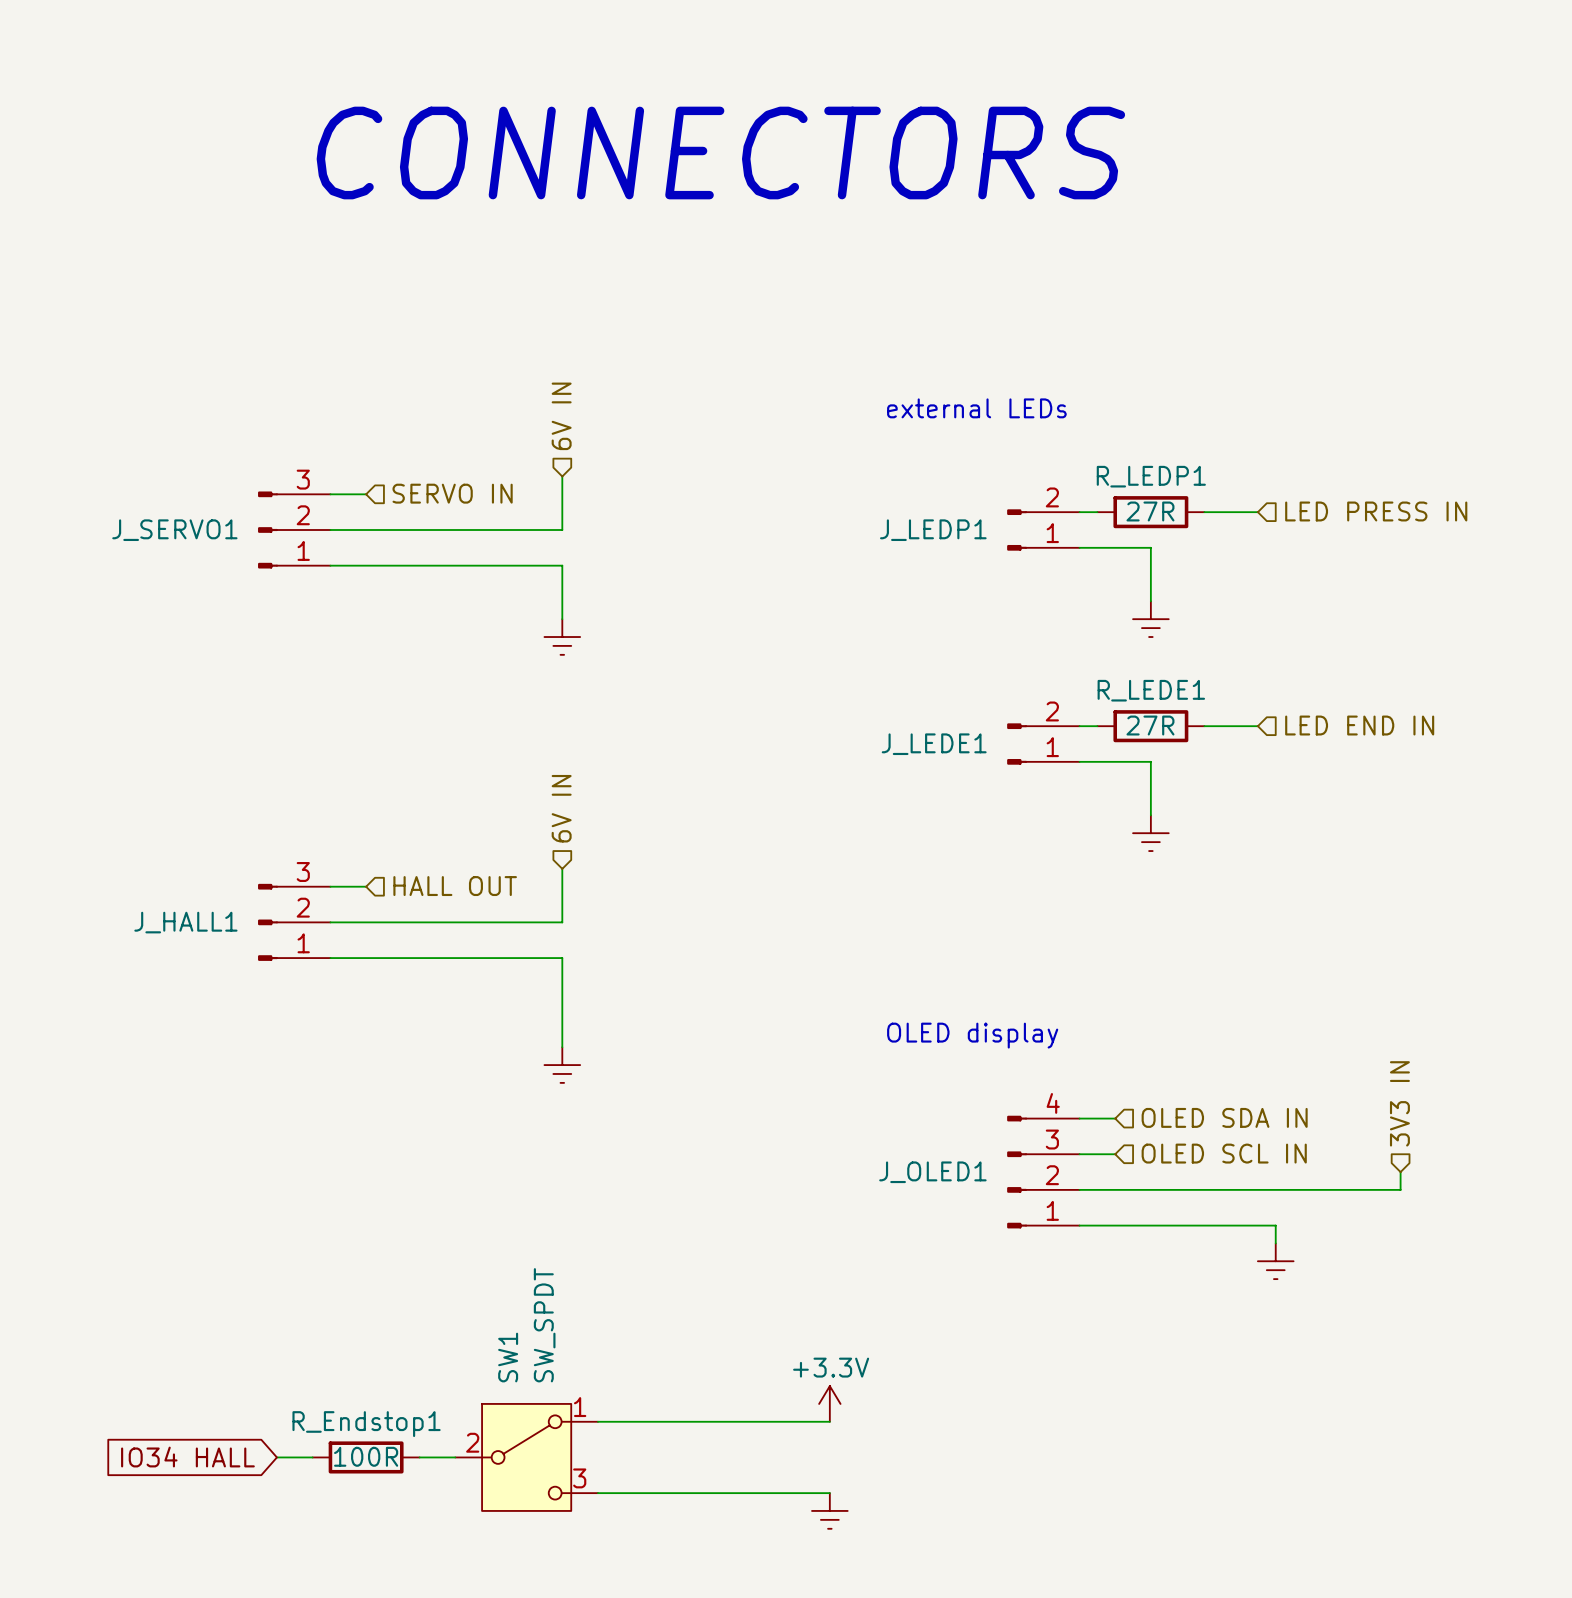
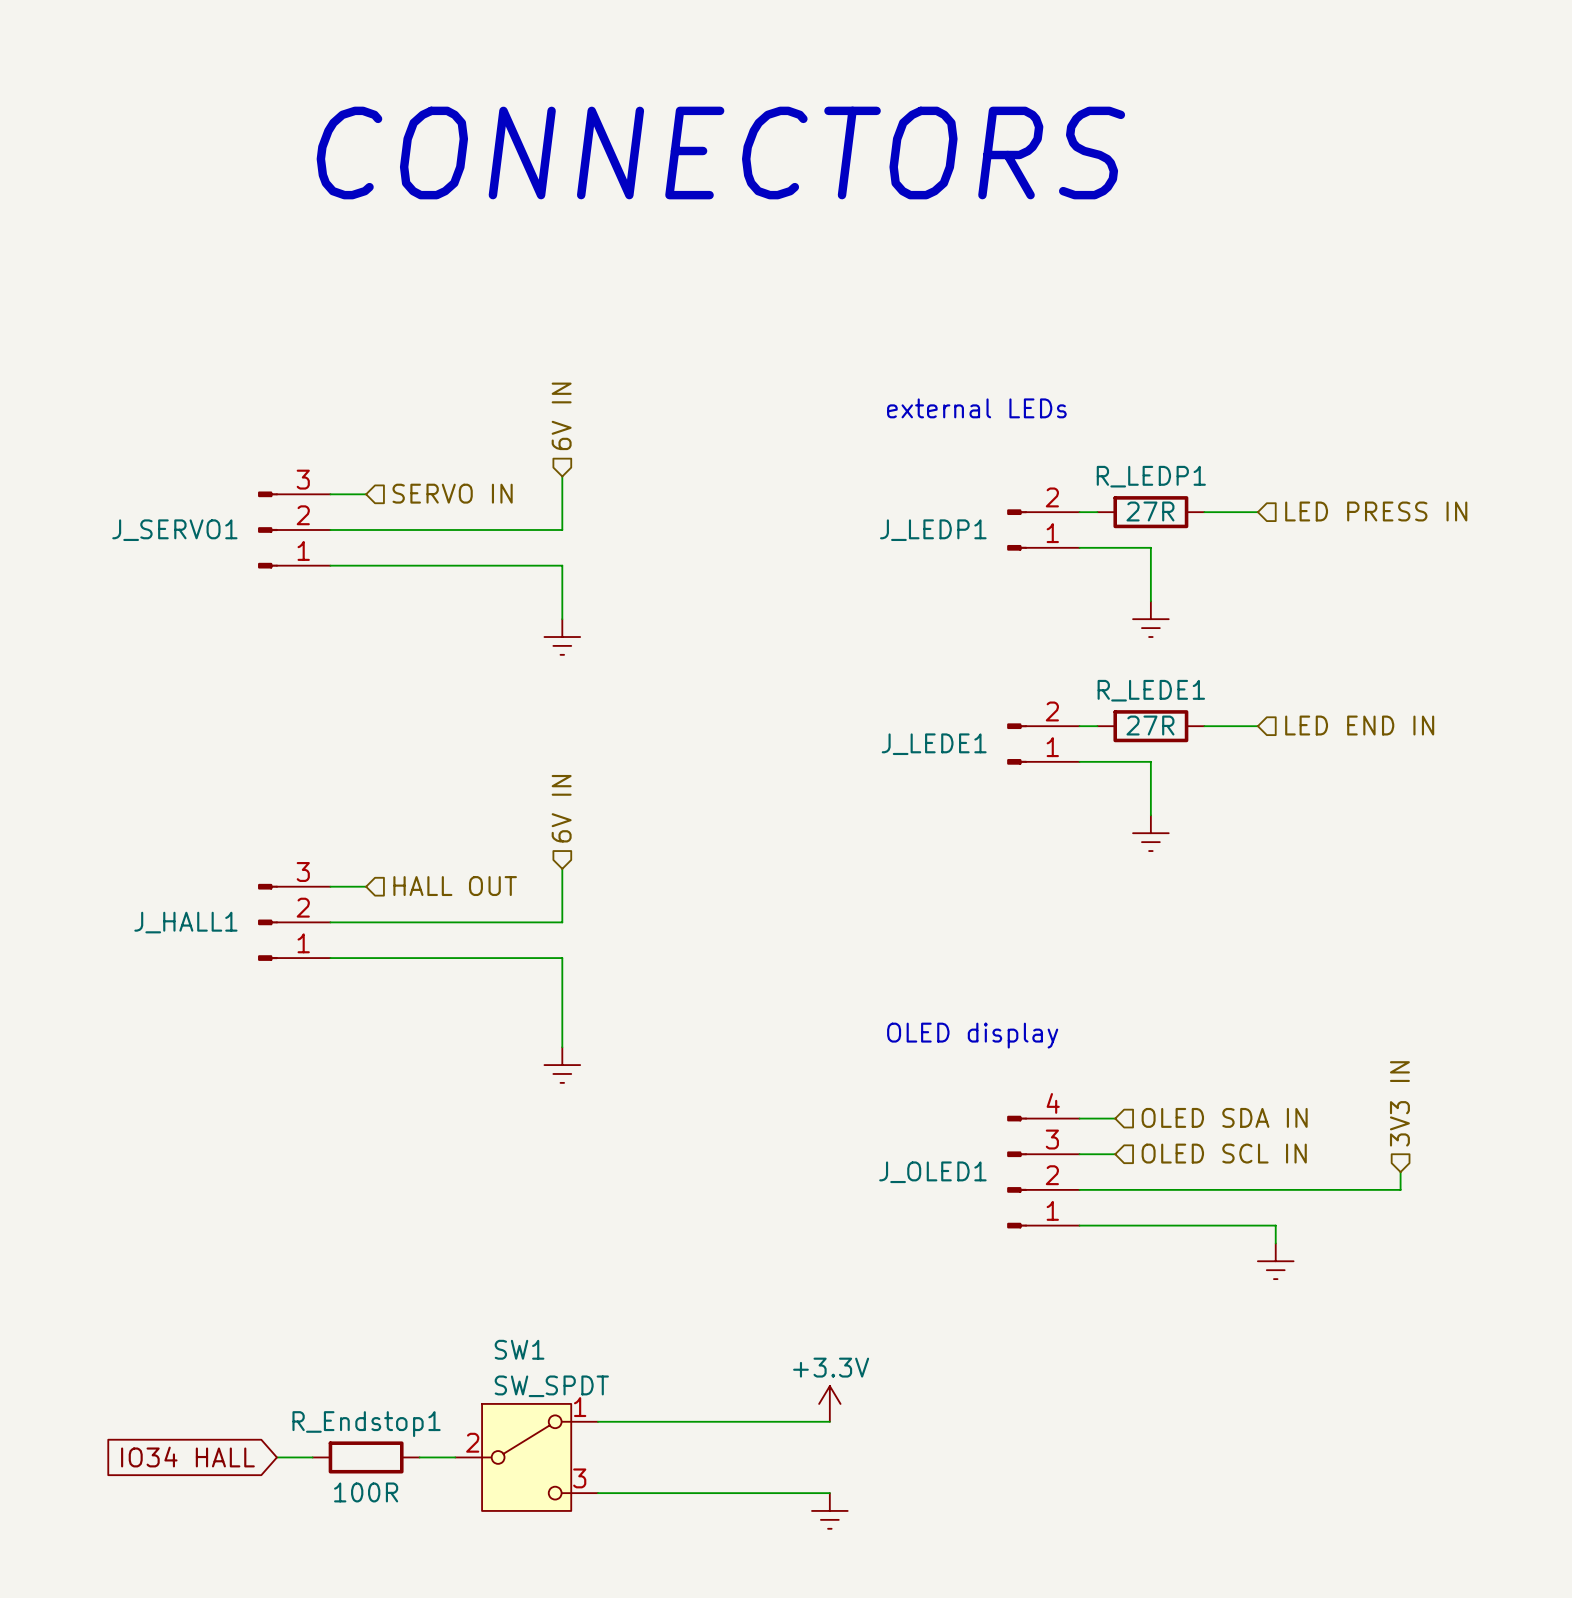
SW1 value rotation: 0° (544, 1325) -> 90° clockwise (551, 1386)
SW1 name rotation: 0° (508, 1357) -> 90° clockwise (519, 1349)
R_Endstop1 value position: 100R (366, 1456) -> 100R (366, 1492)

